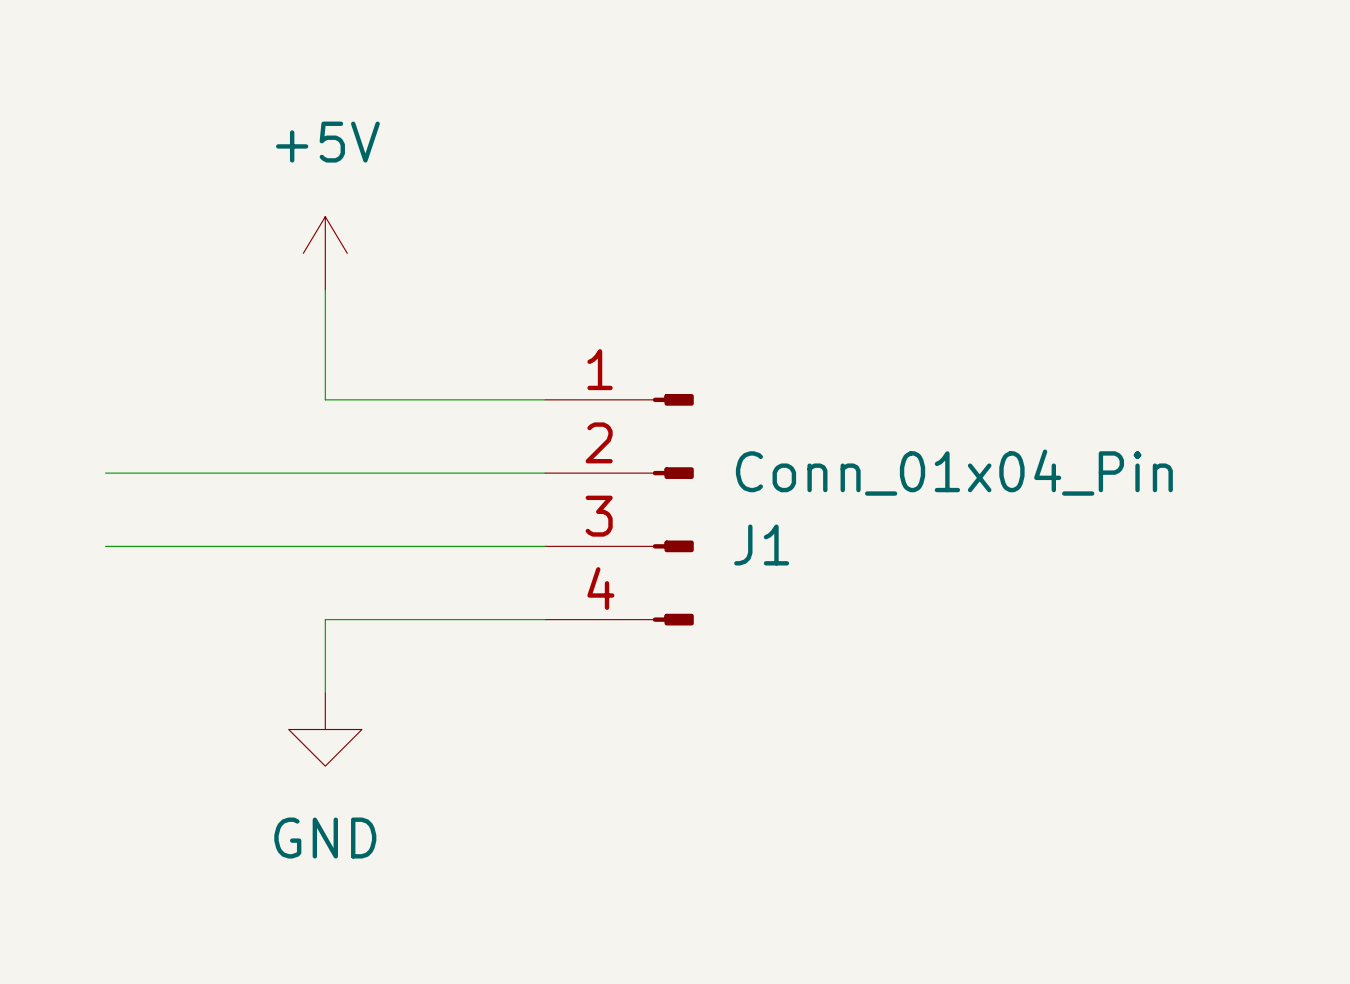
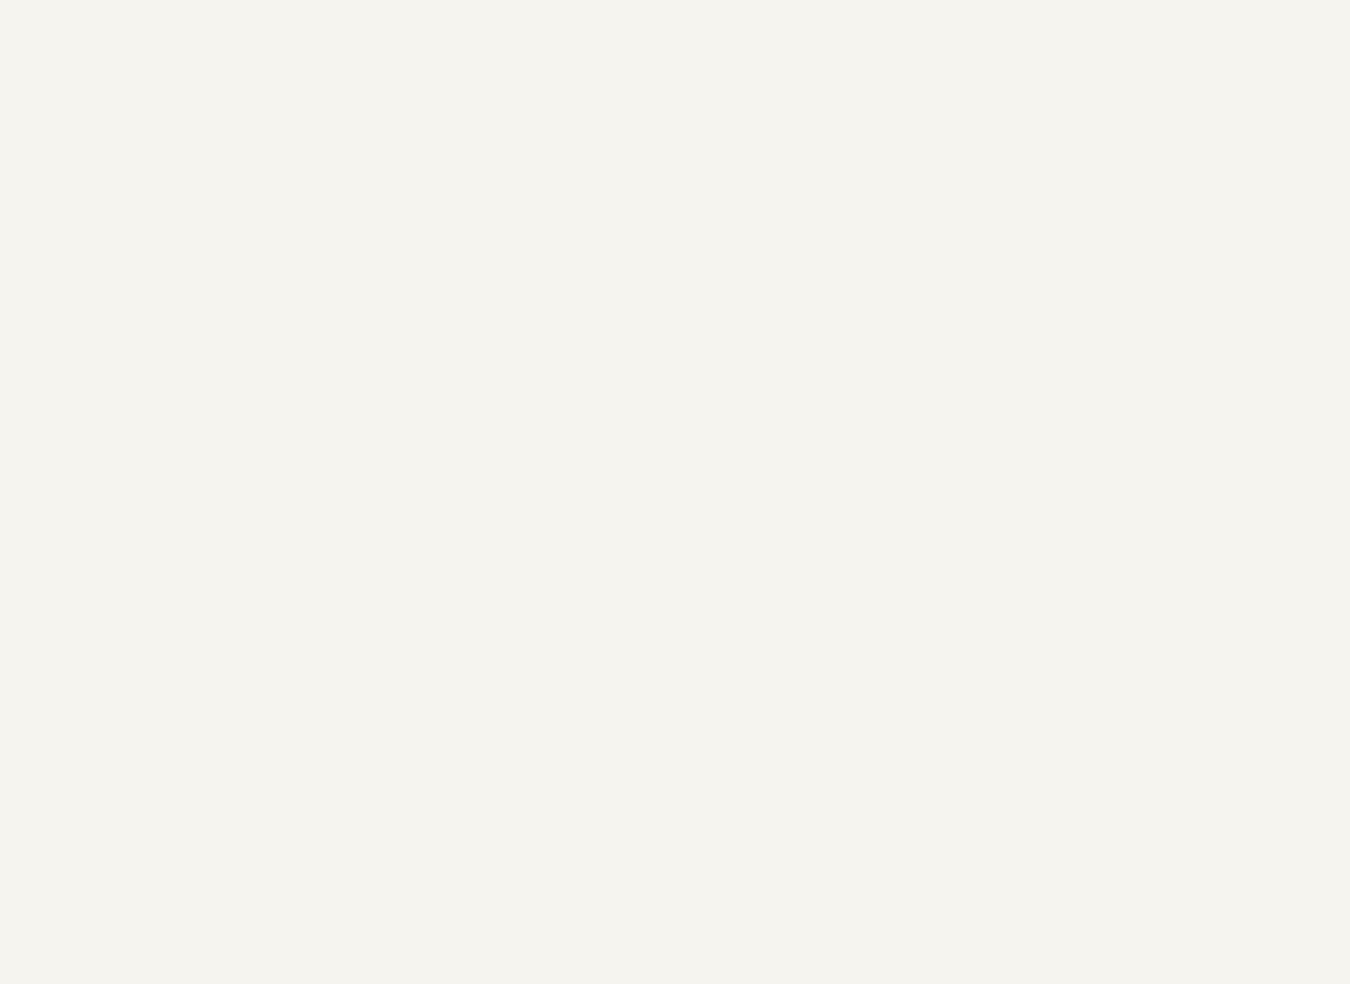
power symbol: +5V (325, 253) -> none
wire: (325, 289) (325, 399) (545, 399) -> none
wire: (105, 473) (545, 473) -> none
J1: Conn_01x04_Pin (619, 509) -> none
wire: (105, 546) (545, 546) -> none
wire: (545, 619) (325, 619) (325, 692) -> none
power symbol: GND (325, 729) -> none

